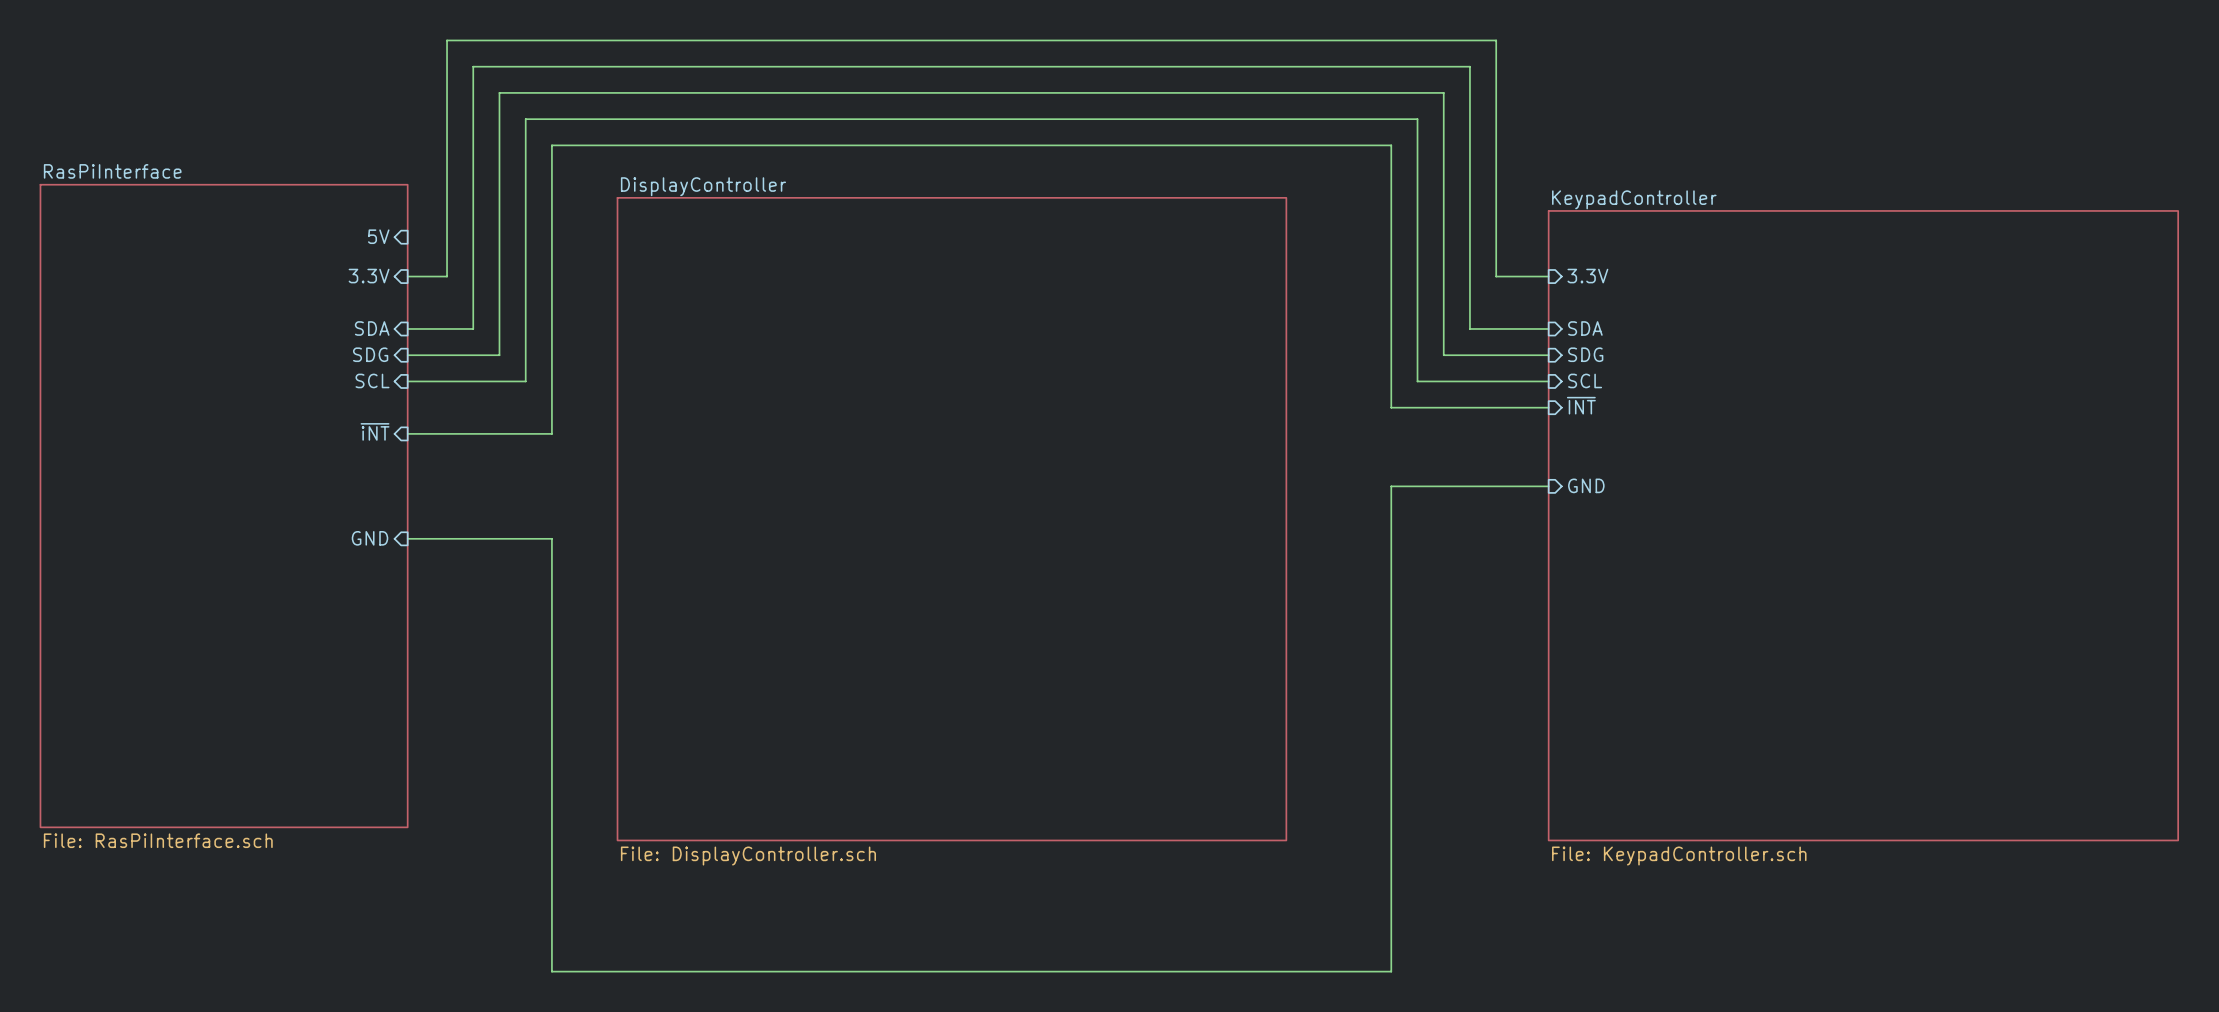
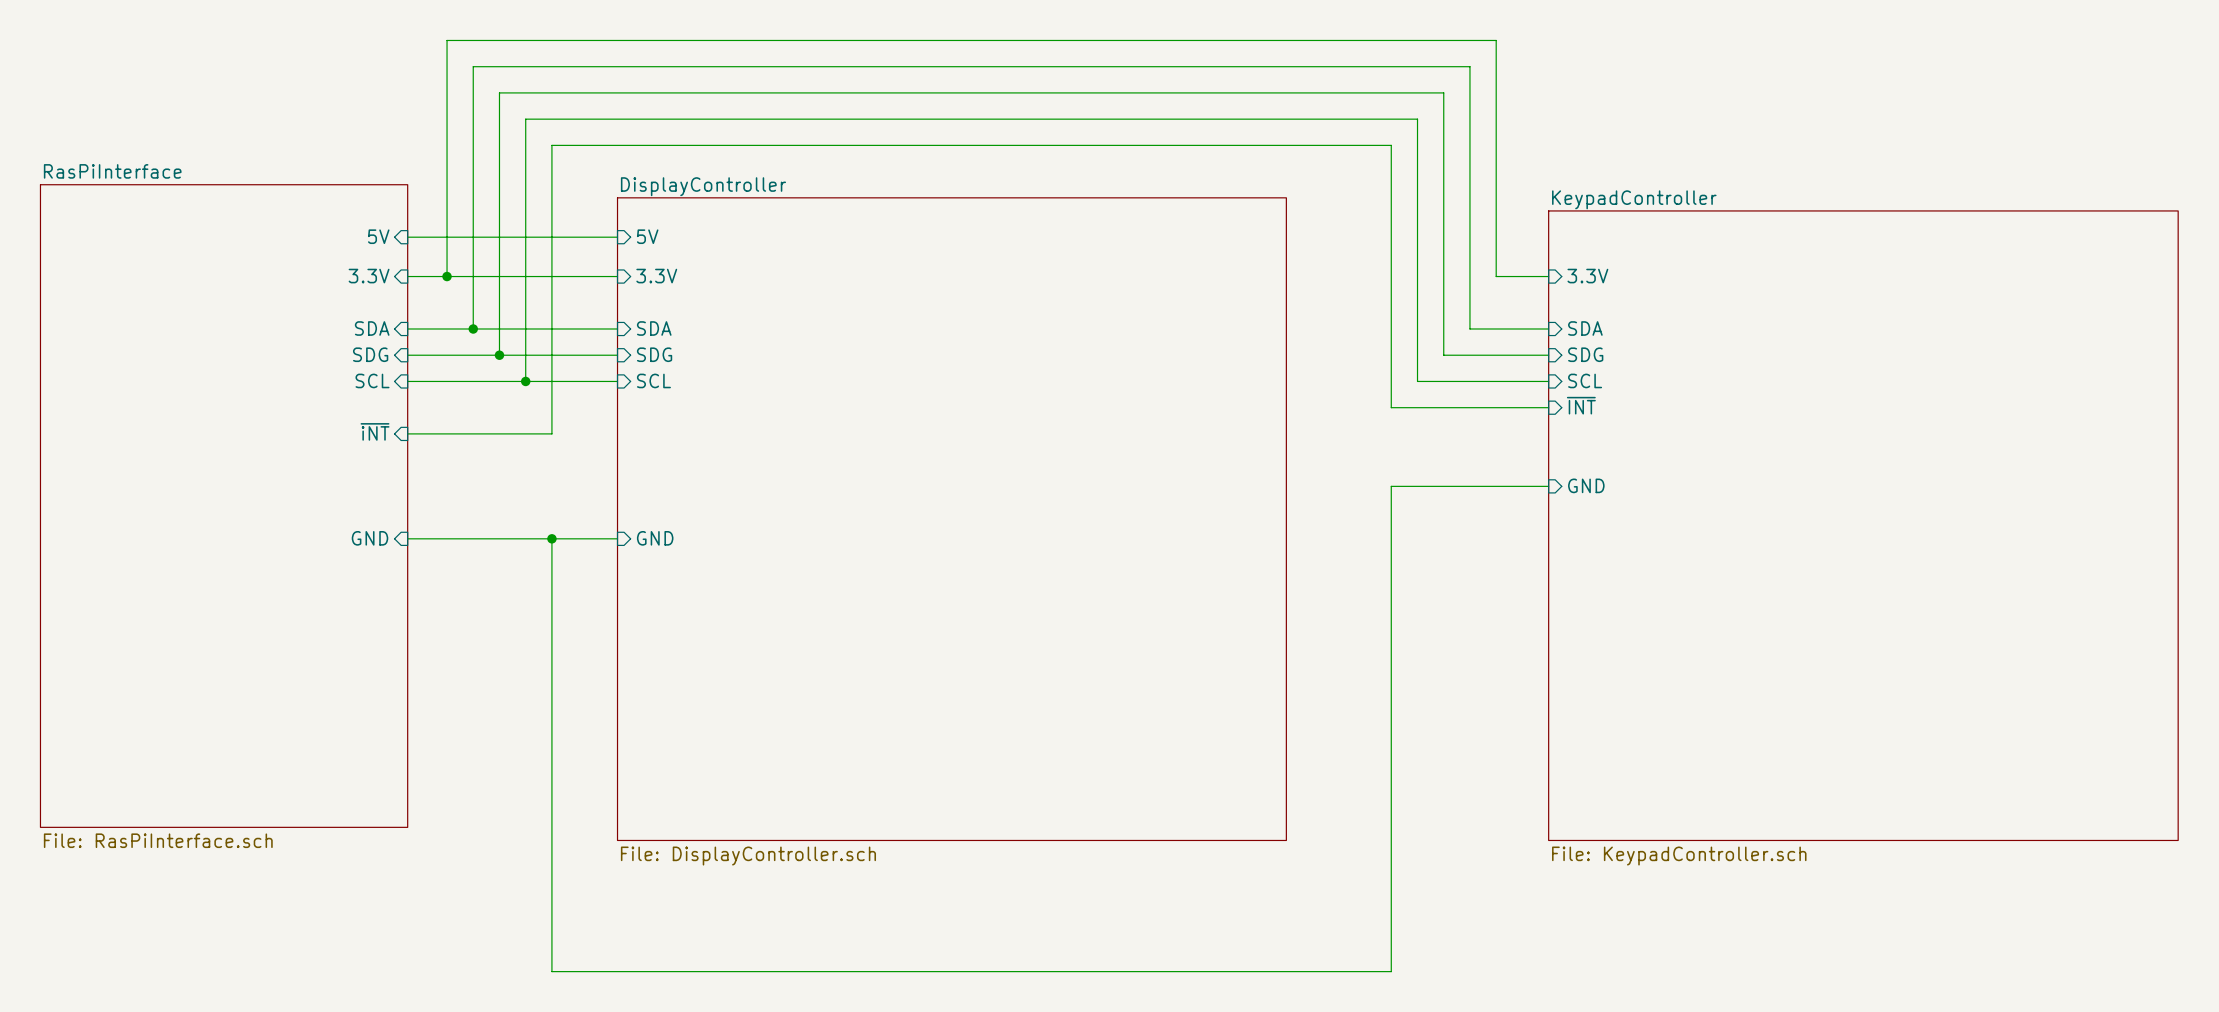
sheet pin: none -> 5V (647, 236)
wire: none -> (407, 237) (617, 237)
wire: none -> (447, 276) (617, 276)
junction: none -> (447, 276)
sheet pin: none -> 3.3V (656, 276)
wire: none -> (473, 328) (617, 328)
junction: none -> (473, 328)
sheet pin: none -> SDA (654, 328)
sheet pin: none -> SDG (654, 354)
wire: none -> (499, 355) (617, 355)
junction: none -> (499, 355)
sheet pin: none -> SCL (653, 380)
wire: none -> (525, 381) (617, 381)
junction: none -> (525, 381)
wire: none -> (551, 538) (617, 538)
junction: none -> (551, 538)
sheet pin: none -> GND (655, 538)

